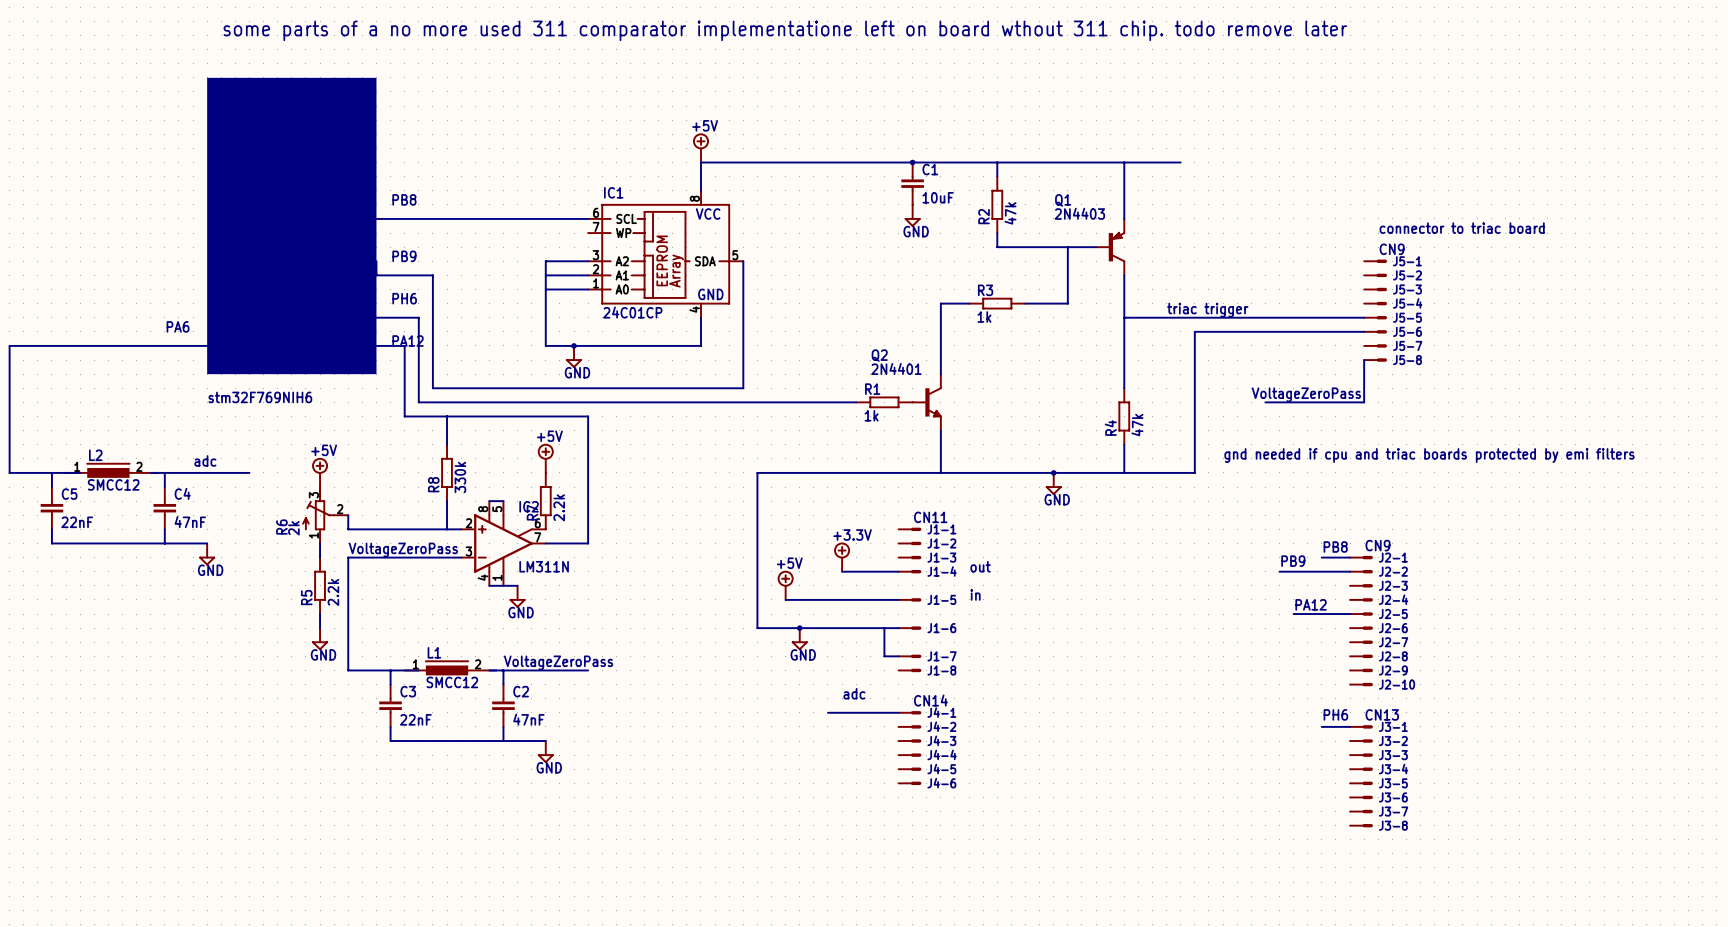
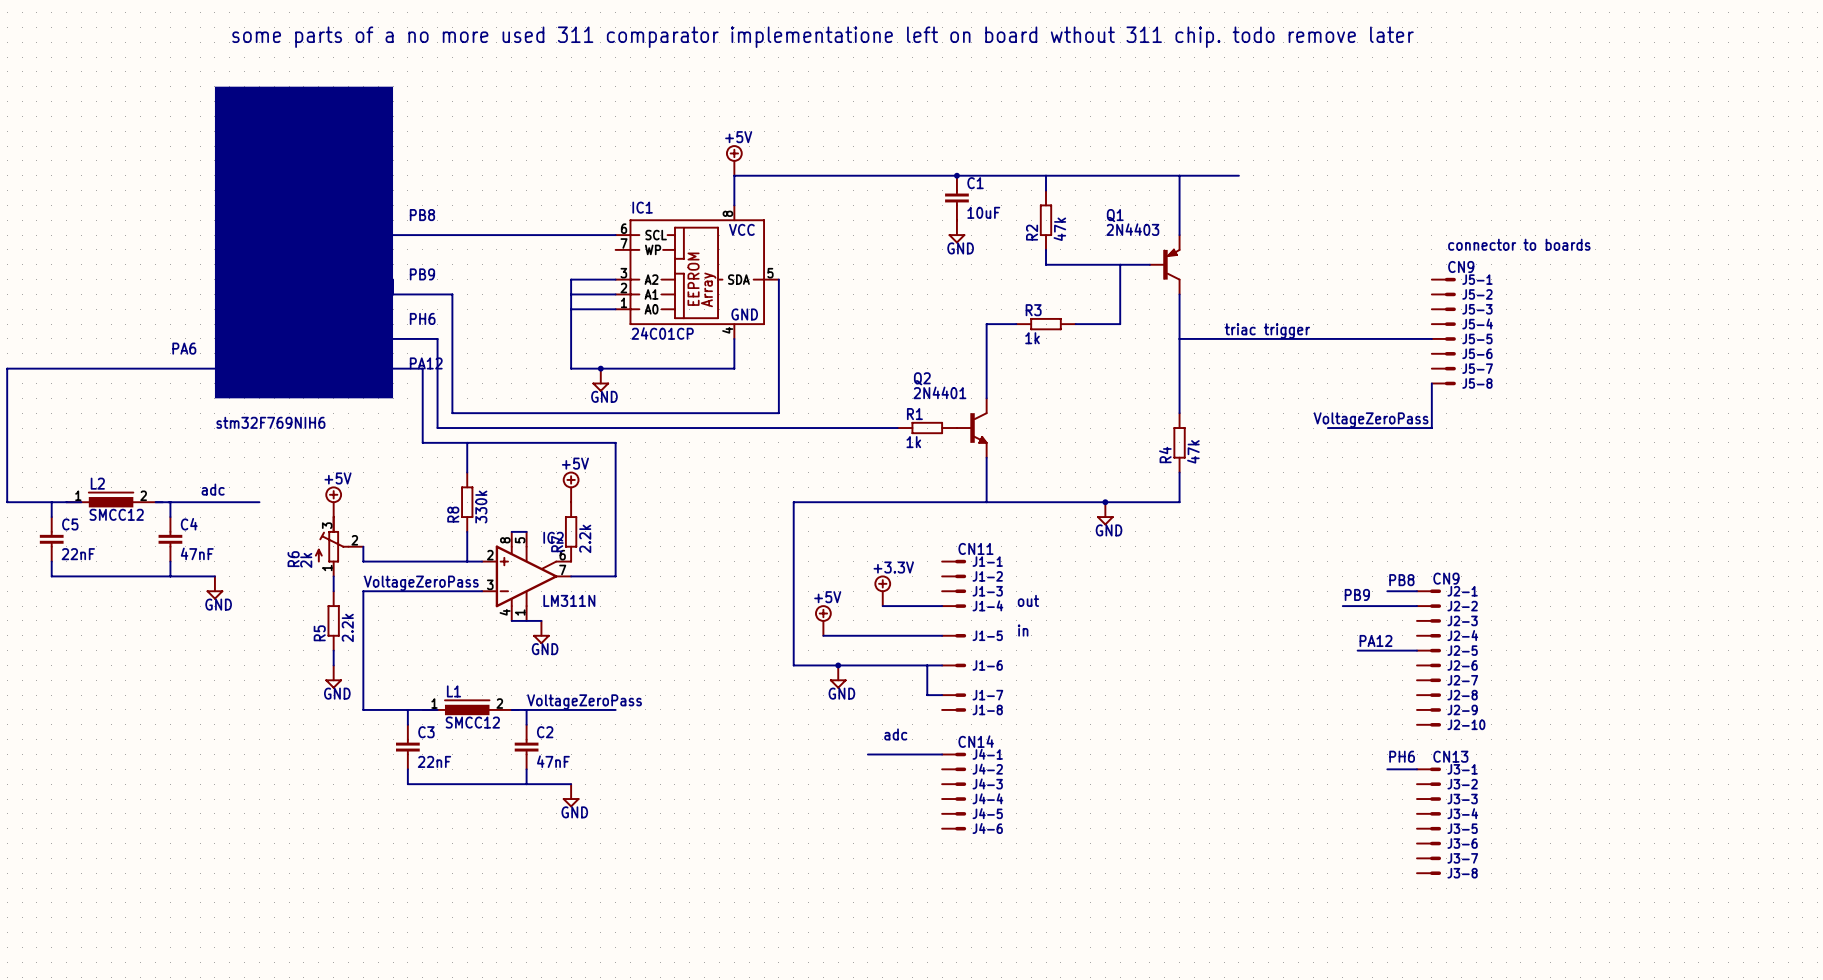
text: connector to triac board (1462, 228) -> connector to boards (1519, 244)
wire: (1364, 331) (1194, 331) (1194, 472) (1124, 472) -> none
text: gnd needed if cpu and triac boards protected by emi filters (1429, 455) -> none

